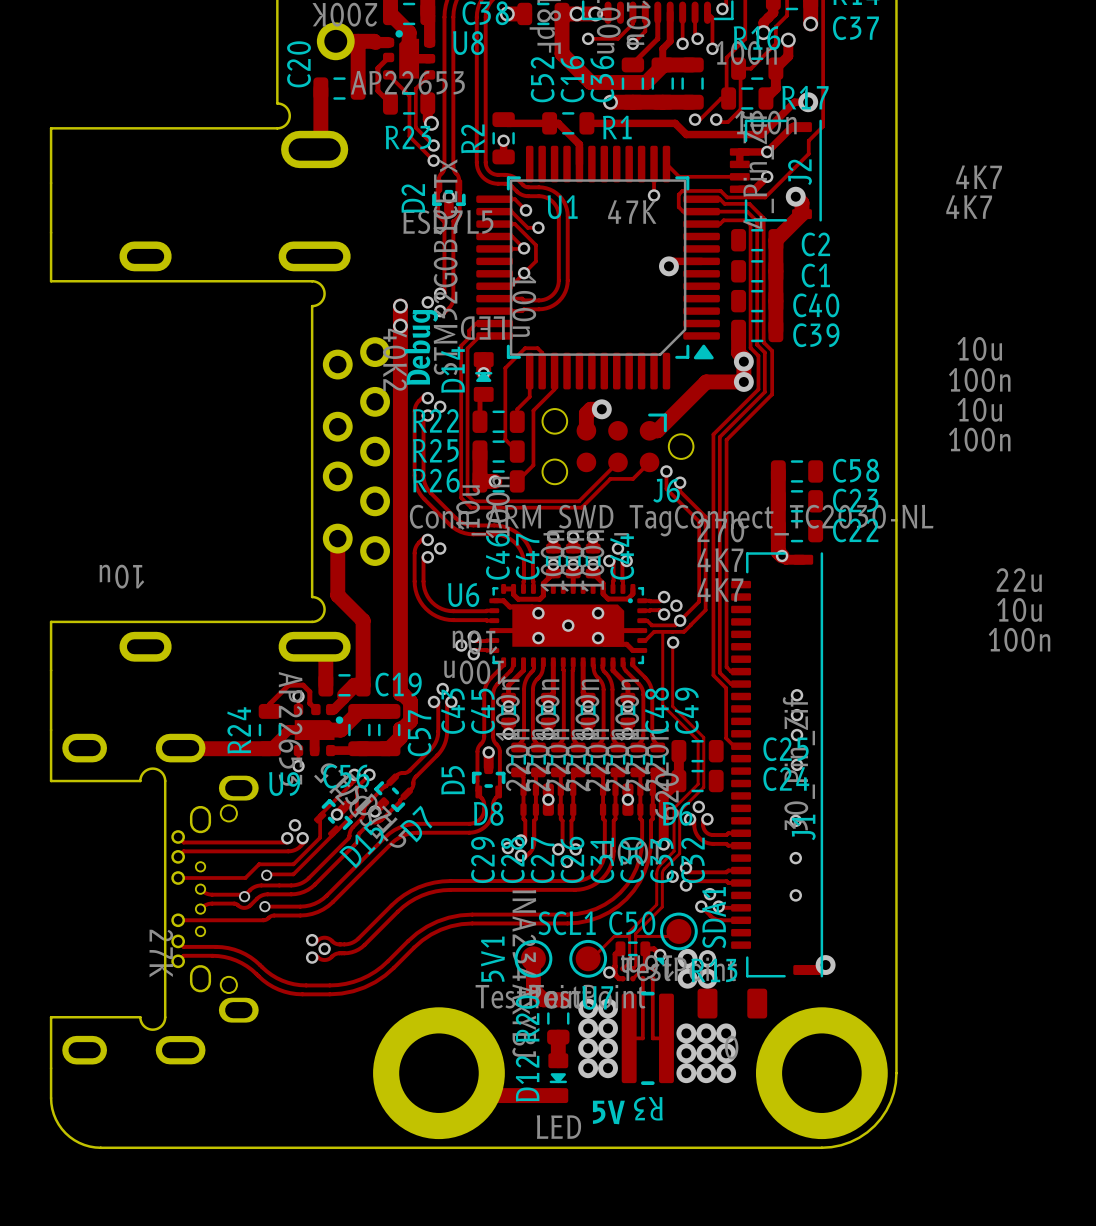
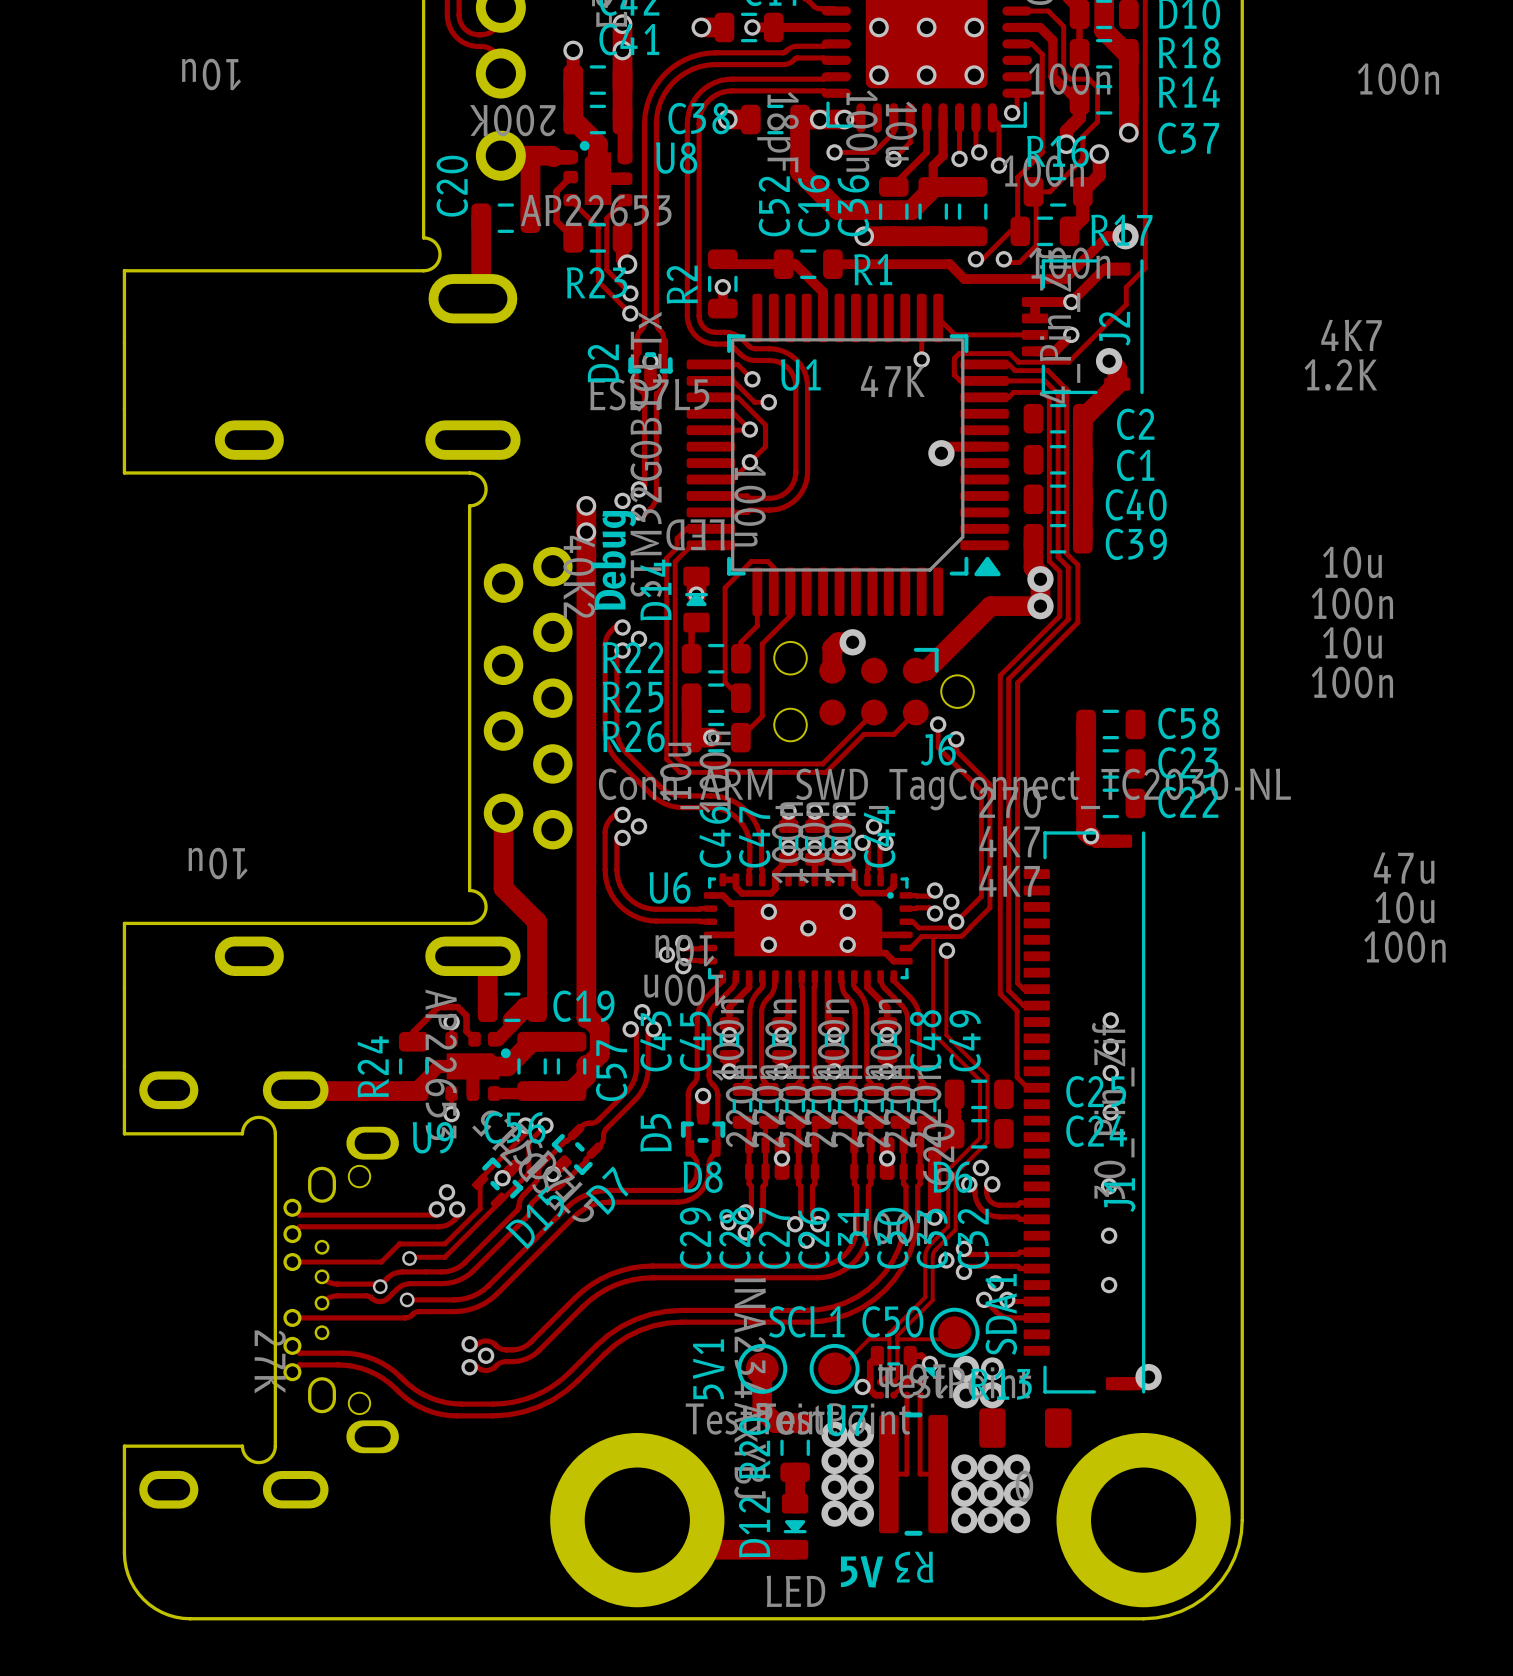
R17 value: 4K7 (969, 207) -> 1.2K (1340, 374)
C58 value: 22u (1019, 580) -> 47u (1404, 868)

